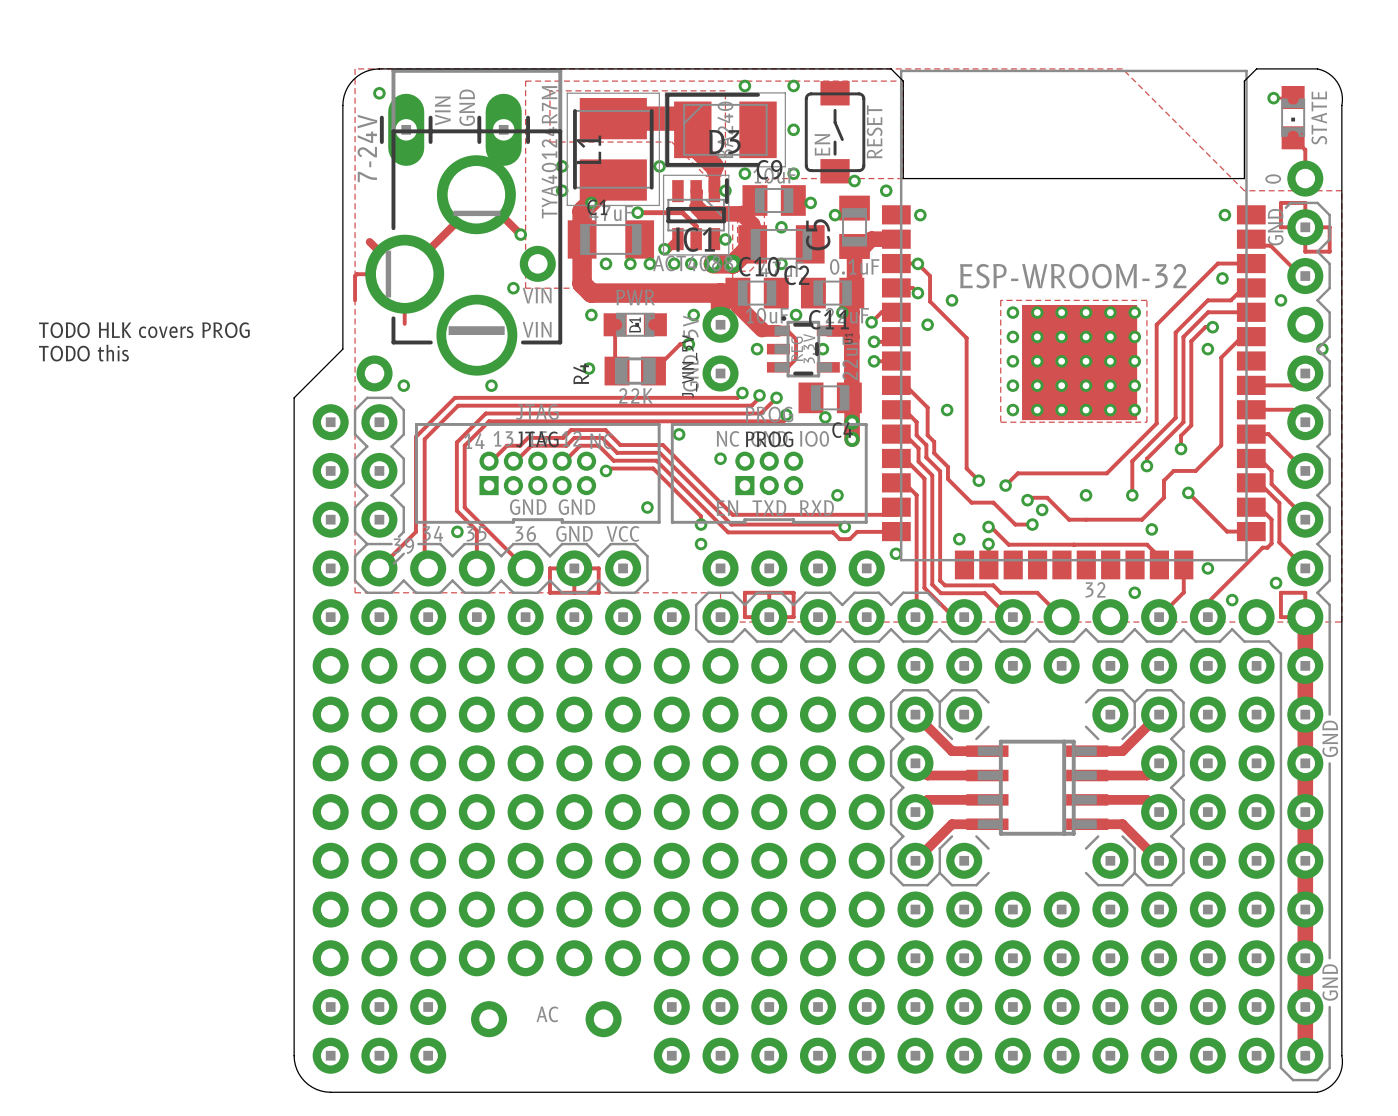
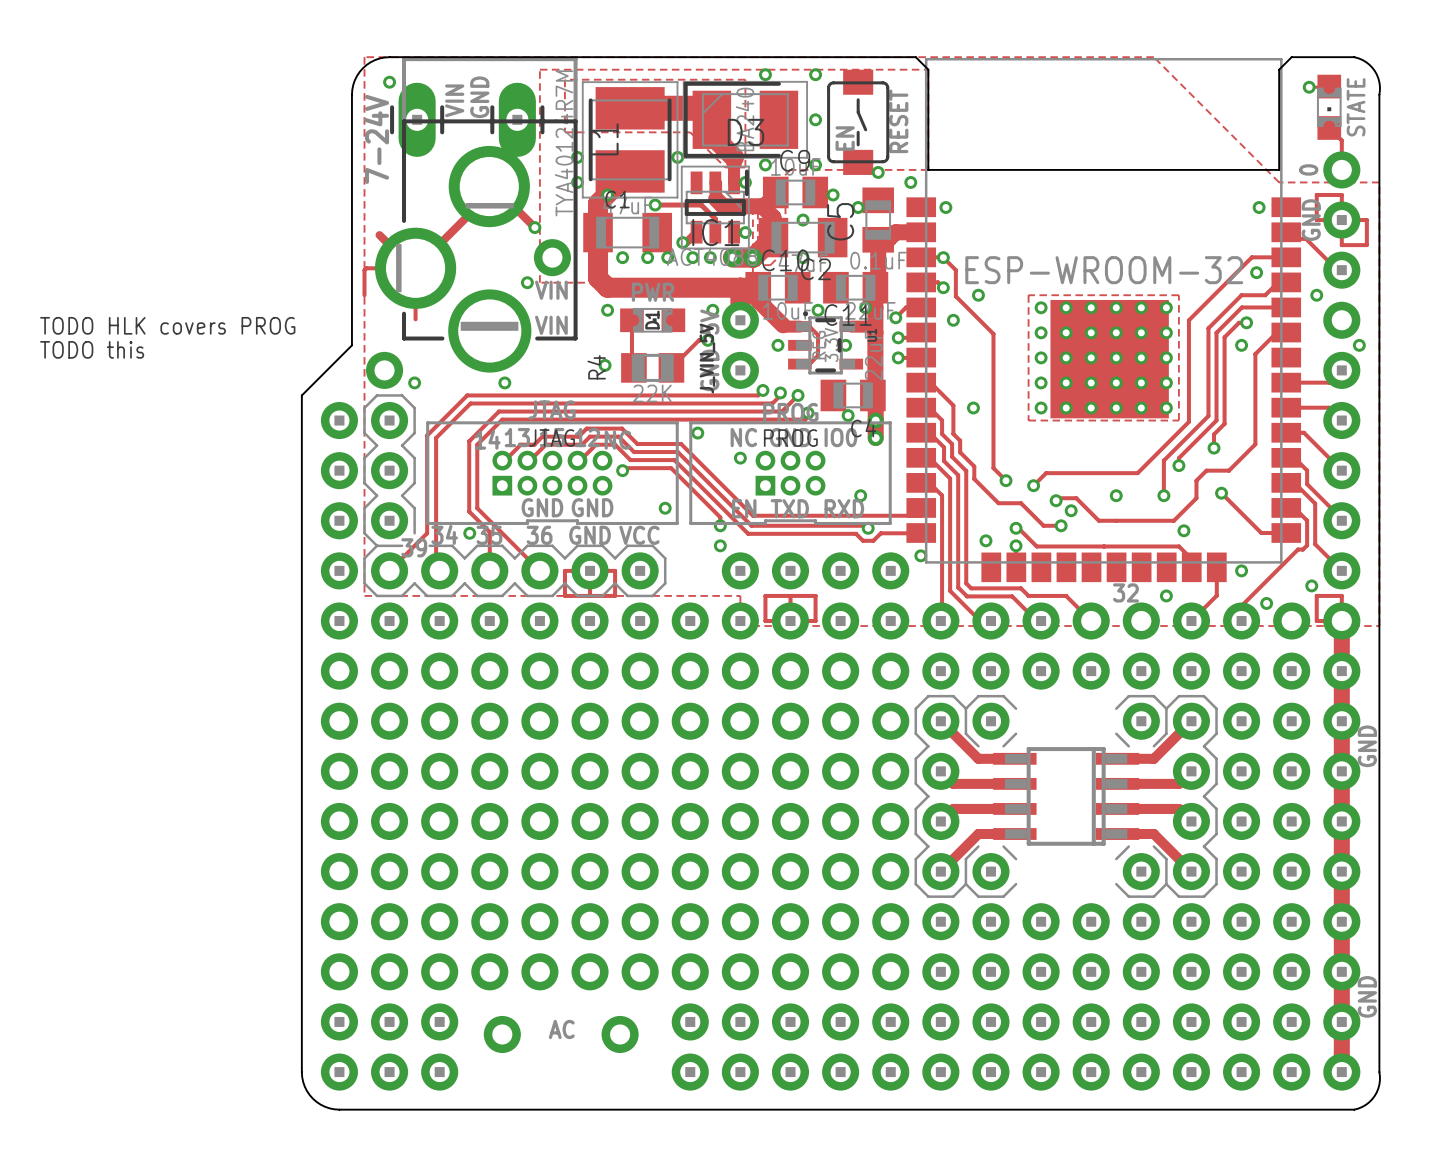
line: (1285, 207) (1290, 202) (1317, 202) (1329, 215) (1329, 239) (1317, 251) (1329, 263) (1329, 288) (1317, 300) (1329, 312) (1329, 336) (1317, 349) (1329, 361) (1329, 385) (1317, 397) (1329, 410) (1329, 434) (1317, 446) (1329, 458) (1329, 483) (1317, 495) (1329, 507) (1329, 531) (1317, 544) (1329, 556) (1329, 580) (1317, 592) (1329, 604) (1329, 714) -> none
line: (403, 531) (398, 536) -> none
line: (403, 553) (394, 563) -> none
line: (939, 604) (927, 592) (903, 592) (891, 604) (878, 592) (854, 592) (842, 604) (830, 592) (805, 592) (793, 604) (781, 592) (757, 592) (744, 604) (732, 592) (708, 592) (696, 604) (696, 629) (708, 641) (732, 641) (744, 629) (757, 641) (781, 641) (793, 629) (805, 641) (830, 641) (842, 629) (854, 641) (878, 641) (891, 629) (903, 641) (927, 641) (939, 629) (952, 641) (976, 641) (988, 629) (1000, 641) (1025, 641) (1037, 629) (1049, 641) (1073, 641) (1086, 629) (1098, 641) (1122, 641) (1134, 629) (1146, 641) (1171, 641) (1183, 629) (1195, 641) (1220, 641) (1232, 629) (1244, 641) (1268, 641) (1280, 653) (1280, 1067) (1293, 1080) (1317, 1080) (1329, 1067) (1329, 1006) -> none
line: (1329, 763) (1329, 958) -> none

